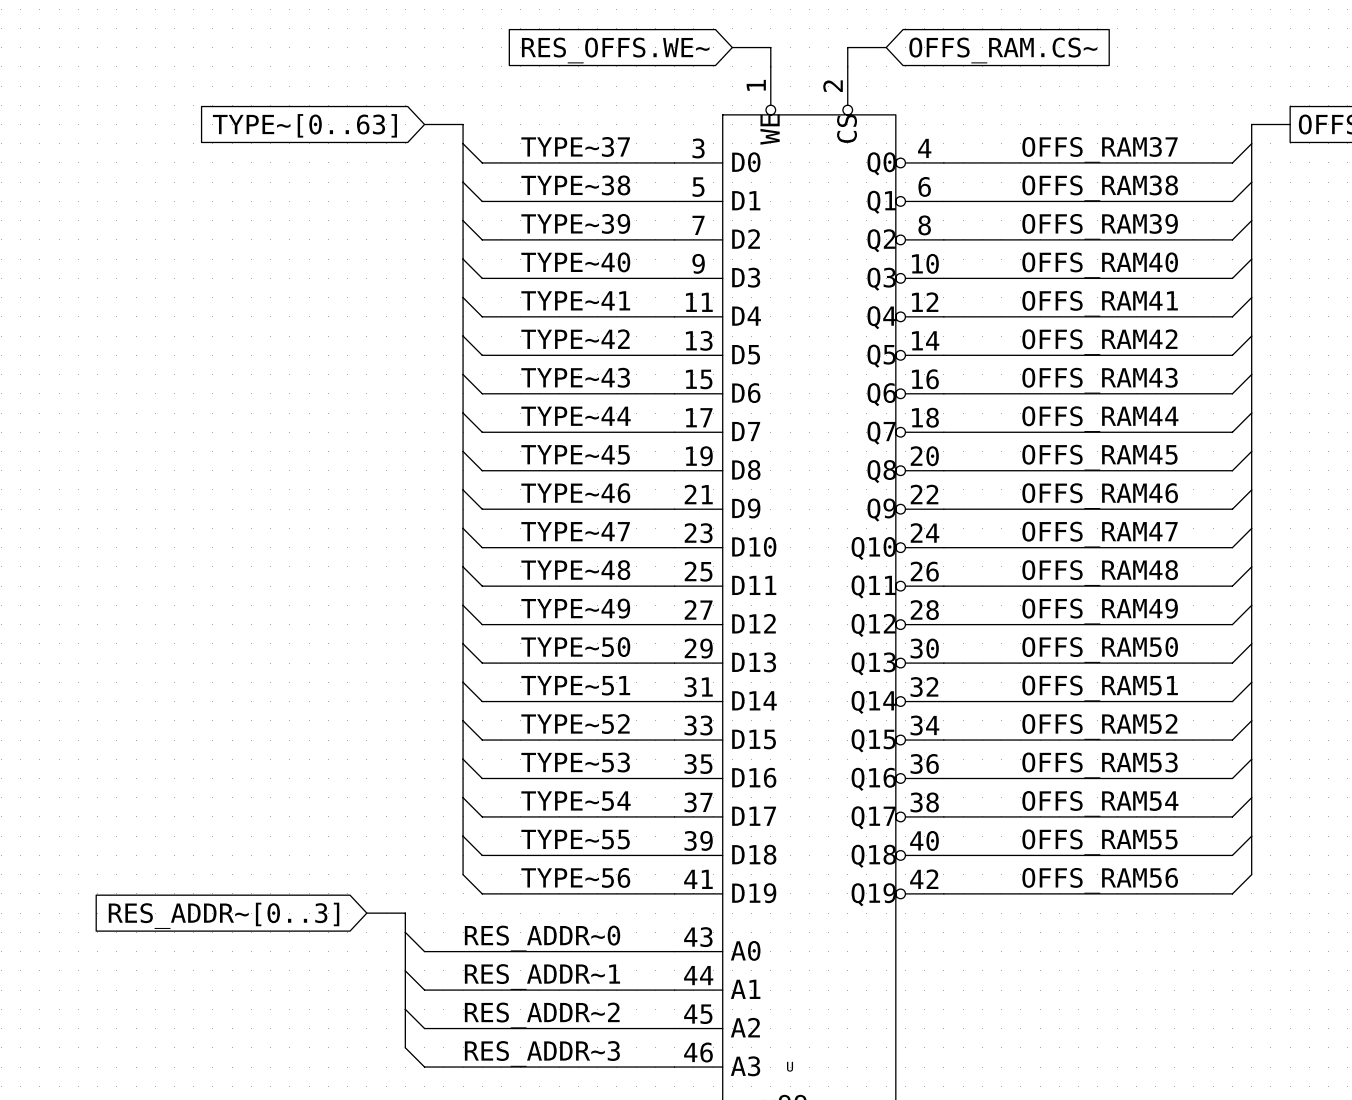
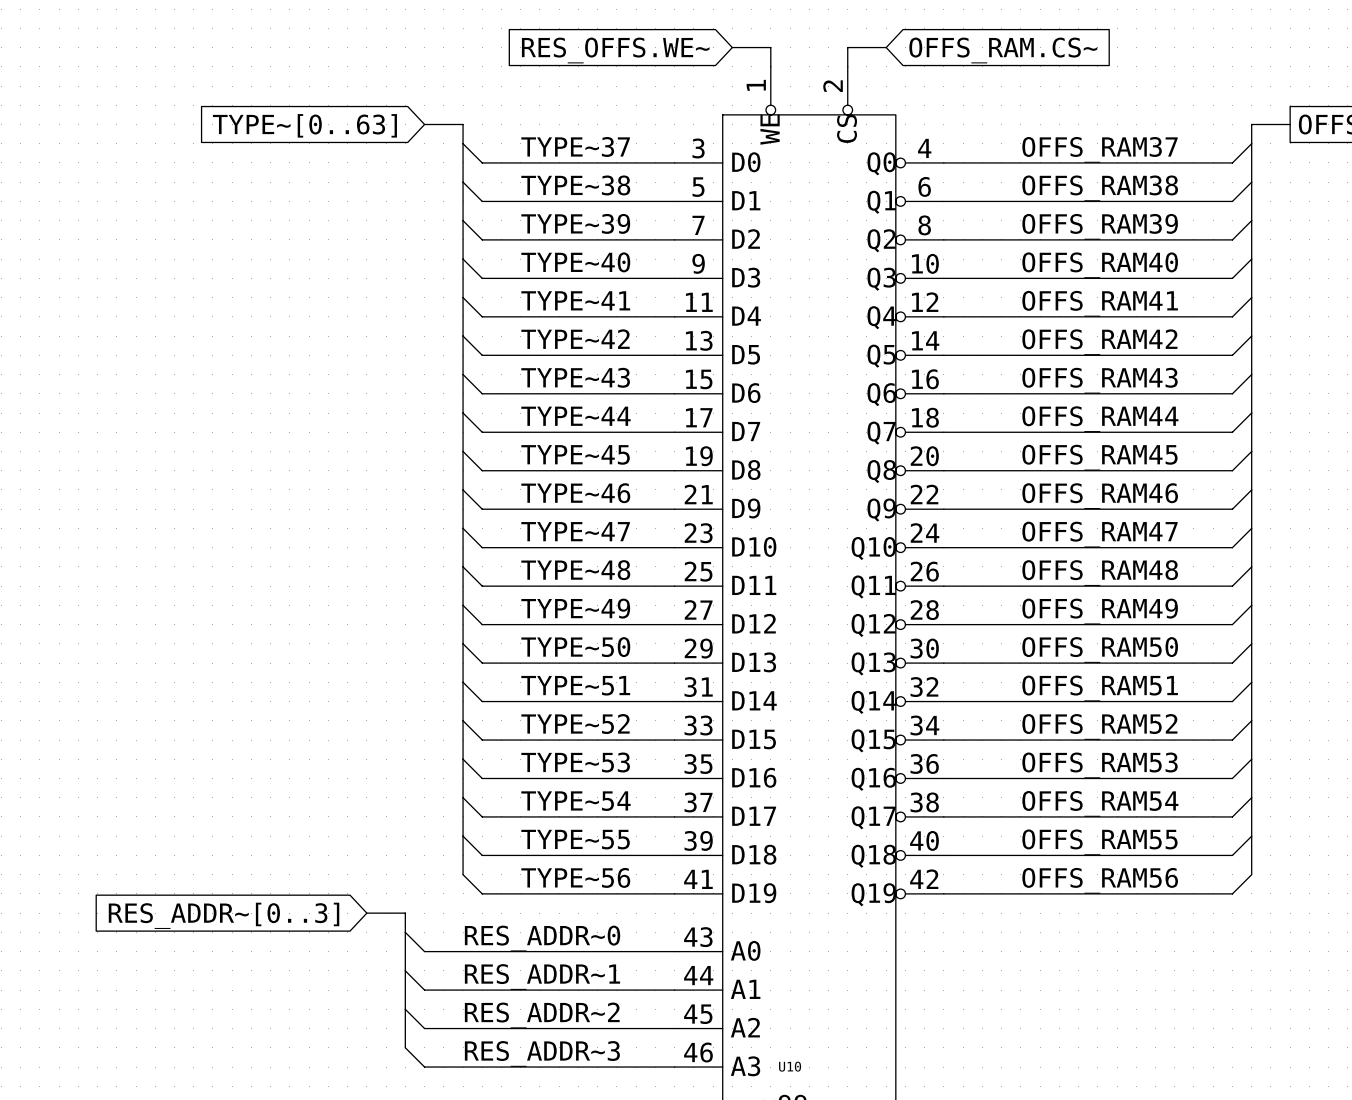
U name: U (790, 1066) -> U10 (790, 1066)

